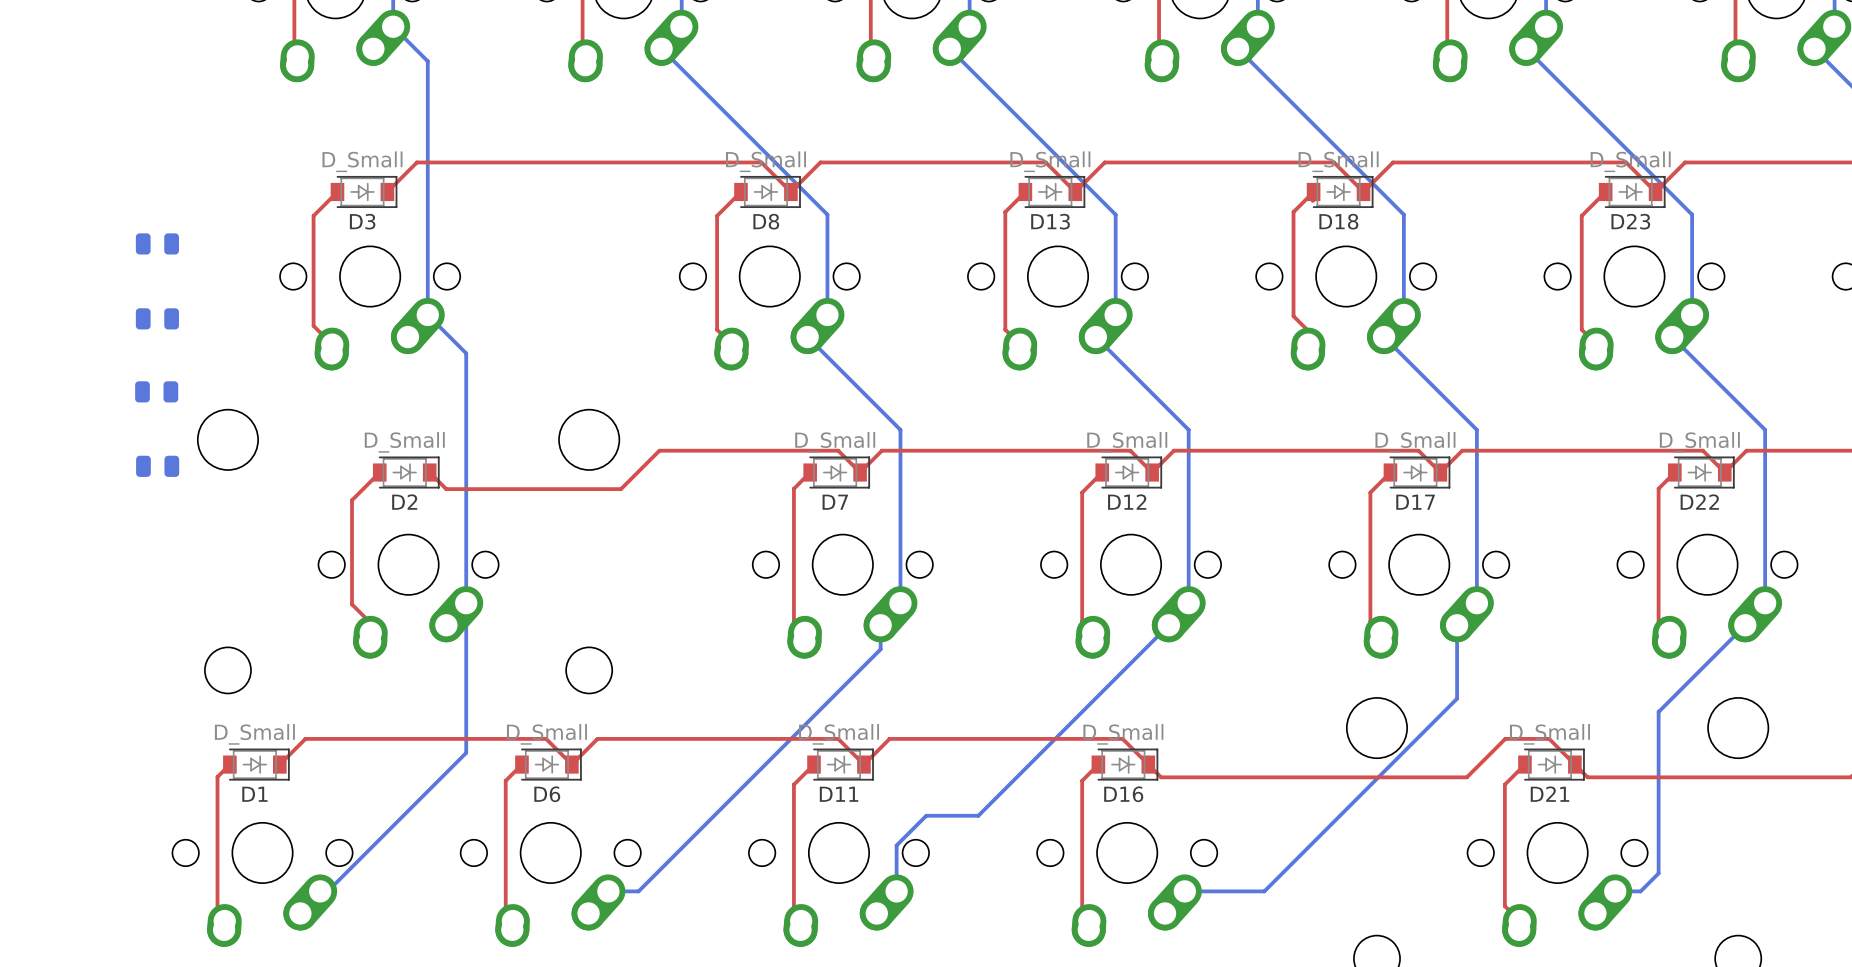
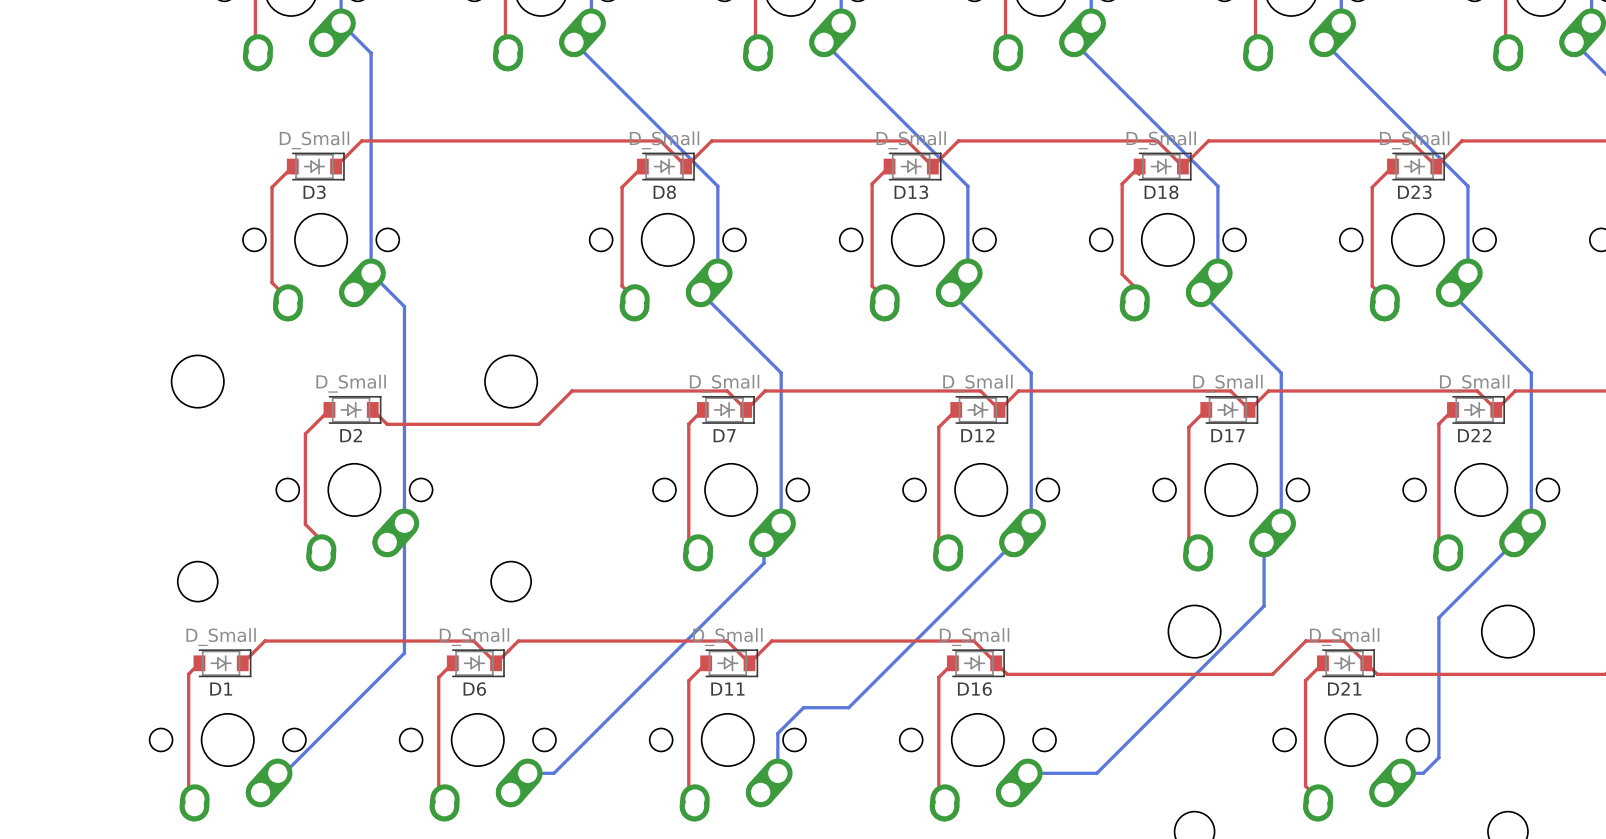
part: (157, 243) -> none
part: (157, 318) -> none
part: (156, 391) -> none
part: (157, 466) -> none

